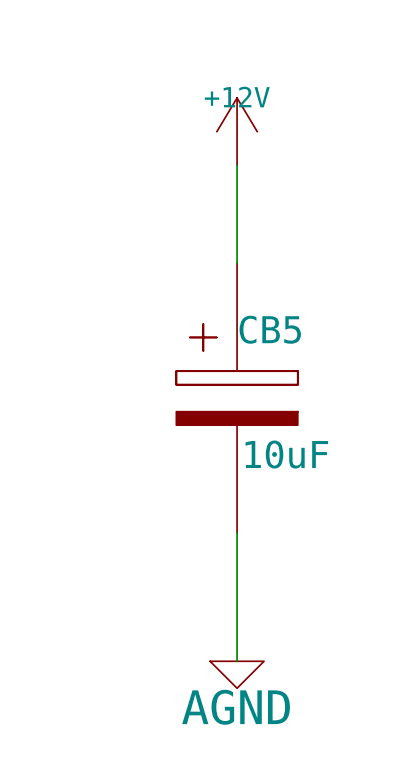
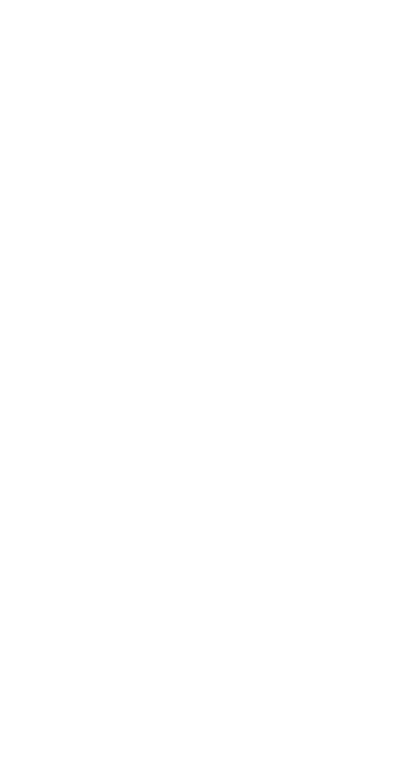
power symbol: +12V (237, 131) -> none
wire: (237, 165) (237, 263) -> none
CB5: 10uF (237, 398) -> none
wire: (237, 533) (237, 661) -> none
power symbol: AGND (237, 674) -> none

